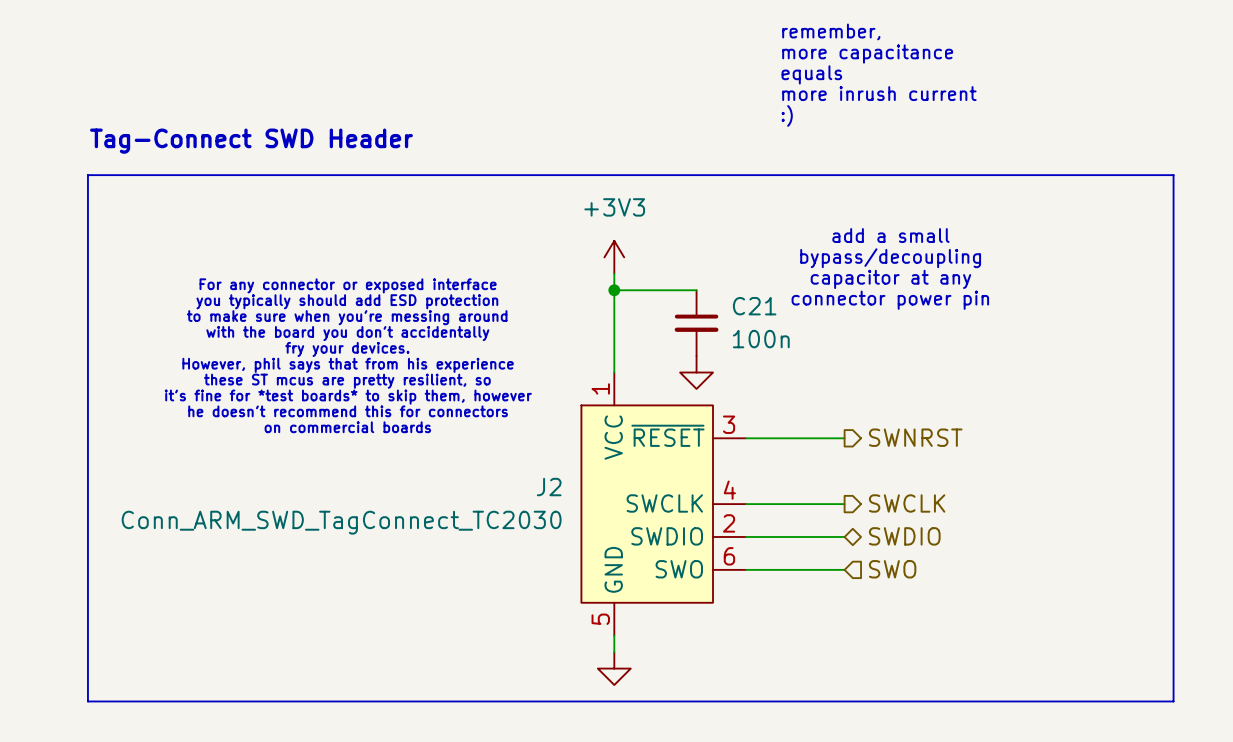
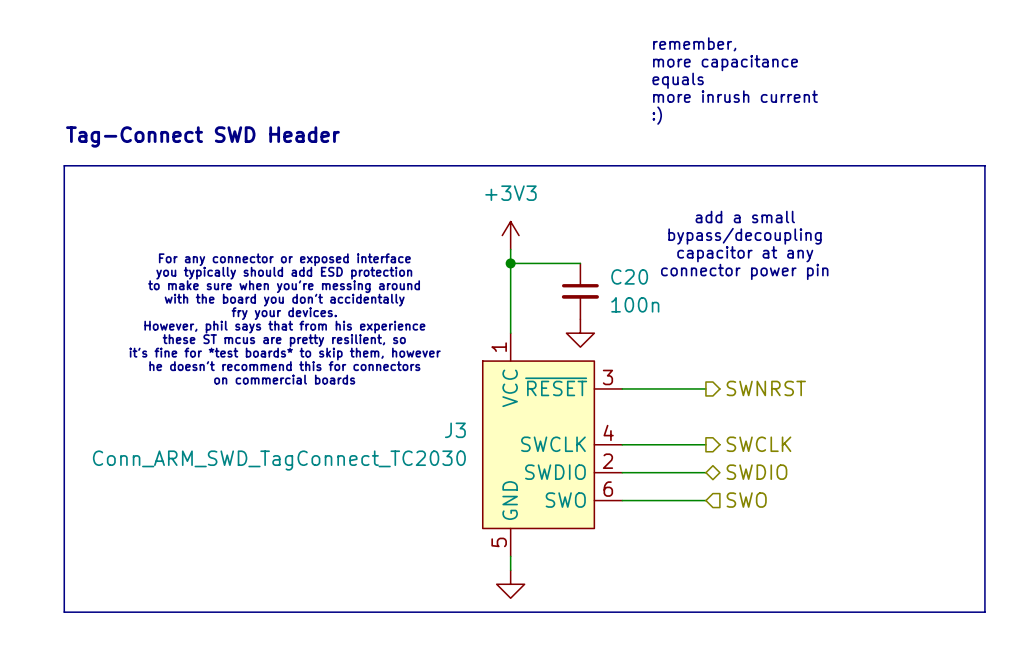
C21 name: C21 (754, 306) -> C20 (629, 276)
J2 name: J2 (549, 487) -> J3 (455, 430)

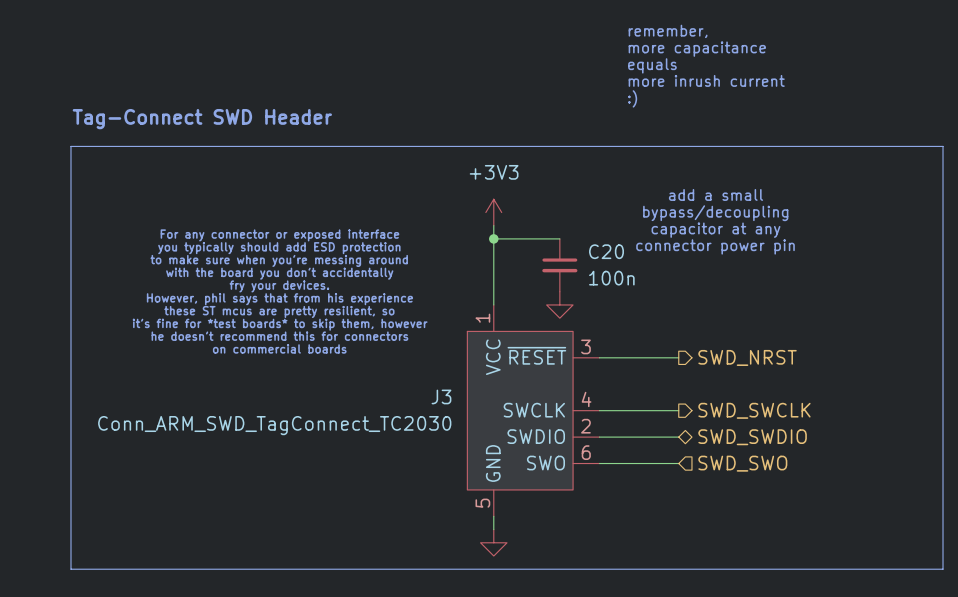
hierarchical label: SWNRST (766, 388) -> SWD_NRST (747, 357)
hierarchical label: SWCLK (758, 444) -> SWD_SWCLK (754, 410)
hierarchical label: SWDIO (756, 472) -> SWD_SWDIO (752, 437)
hierarchical label: SWO (746, 500) -> SWD_SWO (742, 463)

